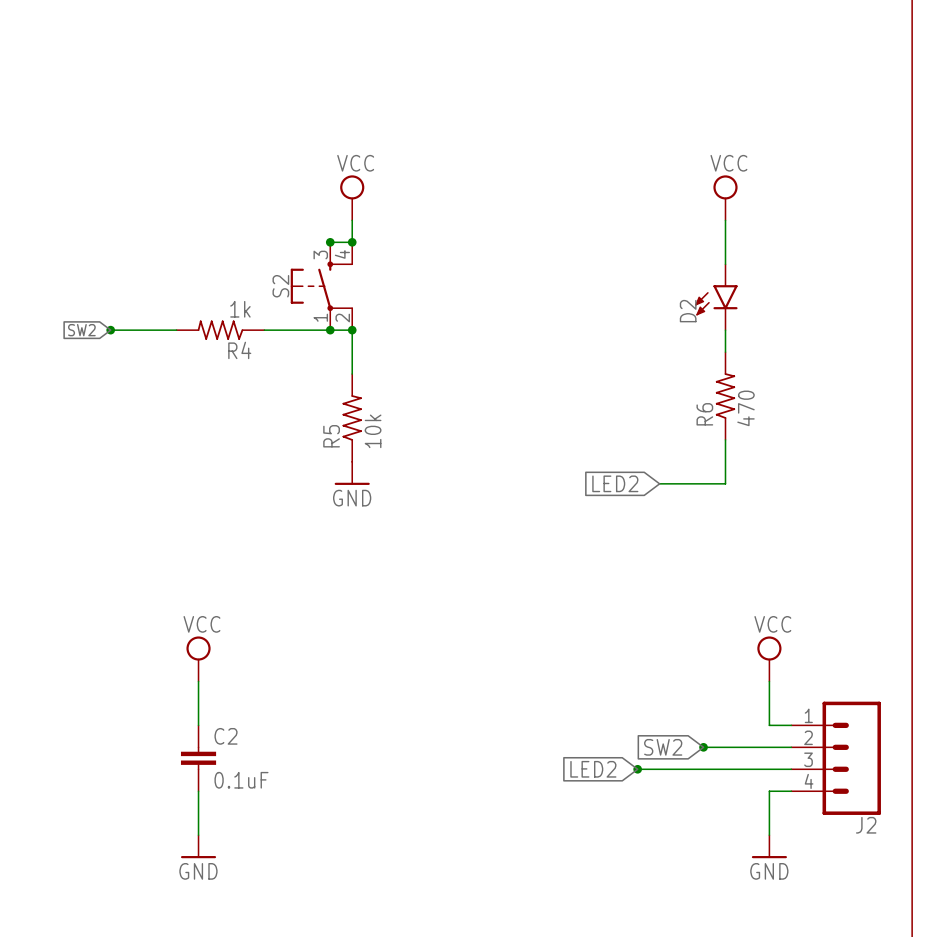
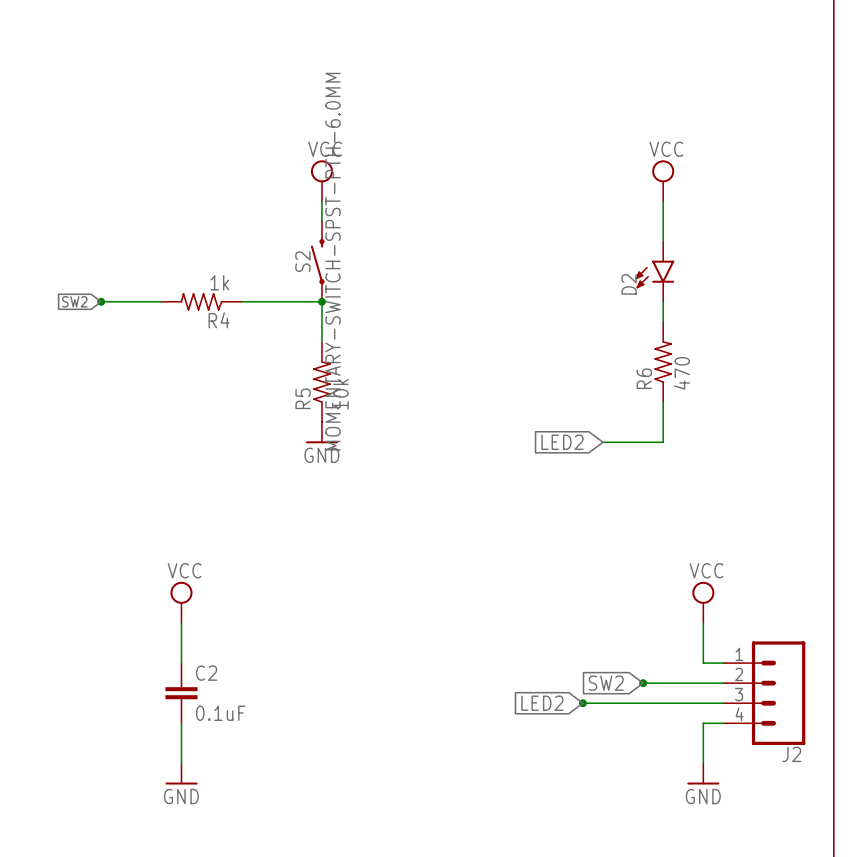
S2 symbol: [290, 242, 353, 331] -> [310, 221, 325, 302]
wire: (330, 242) (352, 242) -> none
junction: (330, 242) -> none
junction: (352, 242) -> none
S2 name position: S2 (280, 286) -> S2 (302, 261)
S2 value: none -> MOMENTARY-SWITCH-SPST-PTH-6.0MM (333, 261)
junction: (330, 330) -> none

